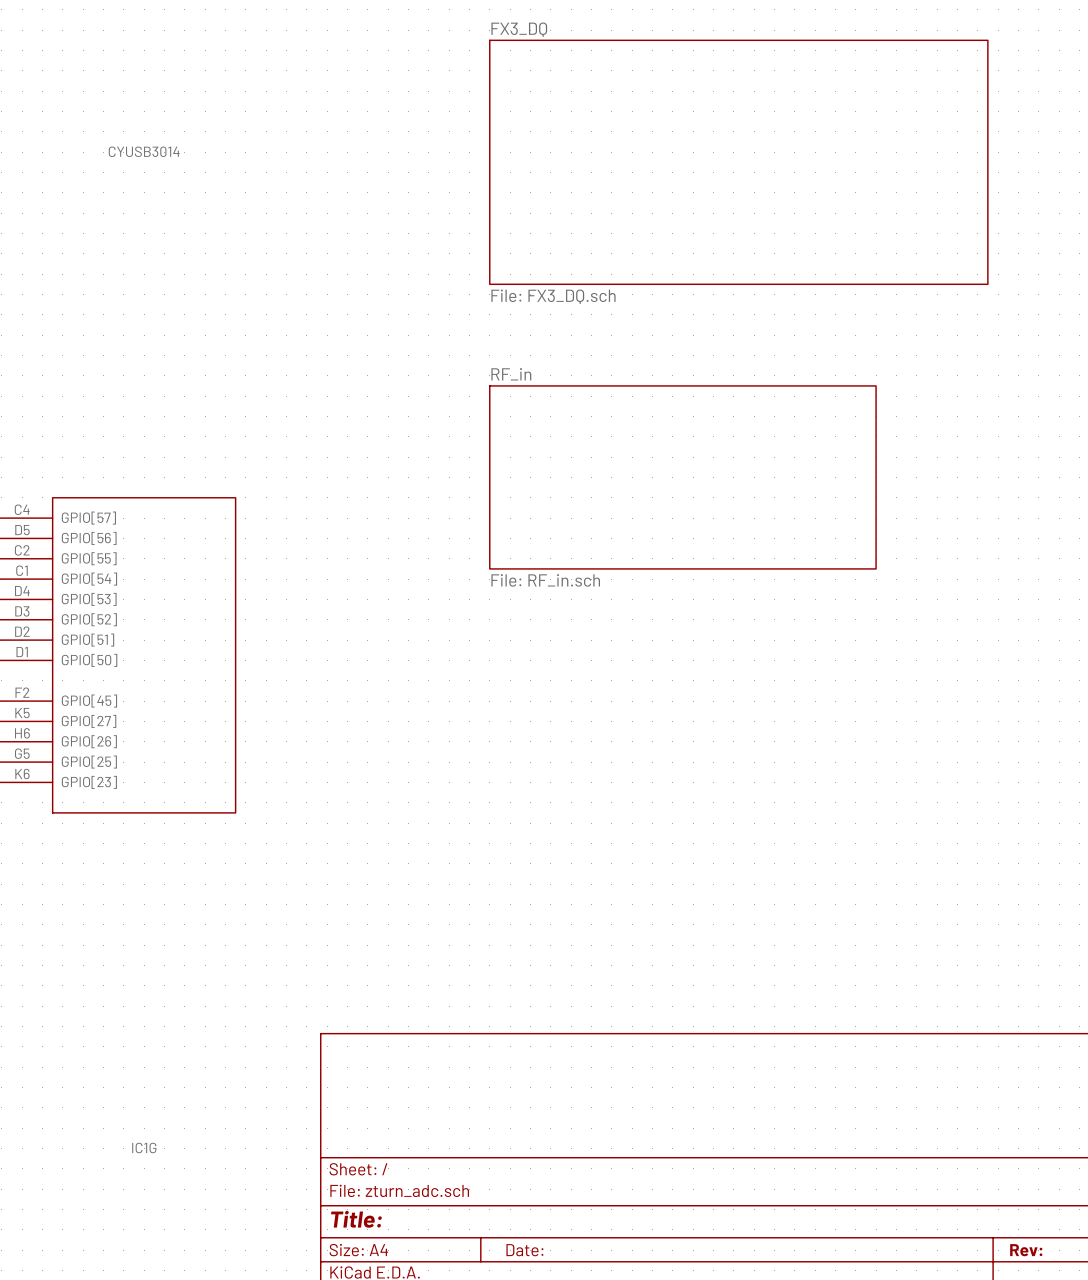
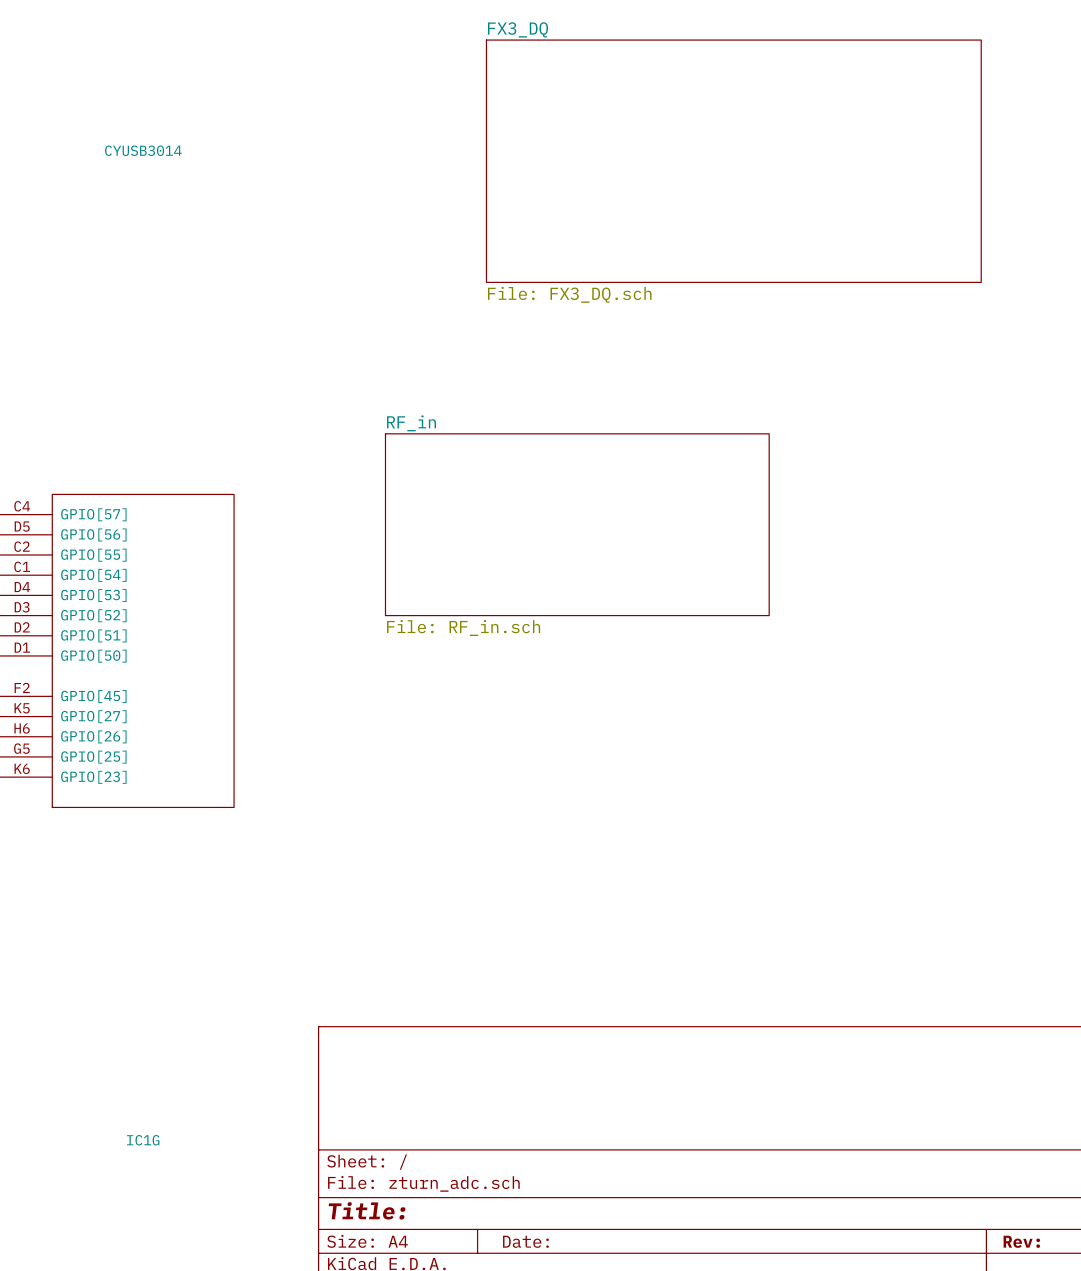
sheet RF_in position: (682, 477) -> (577, 524)

